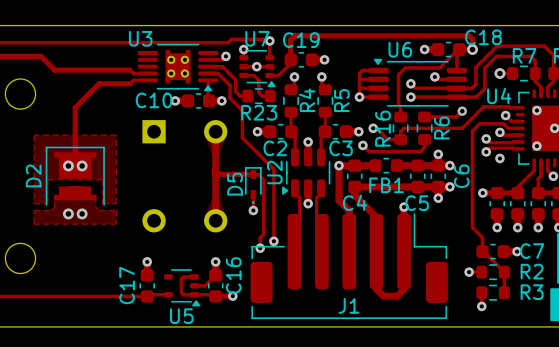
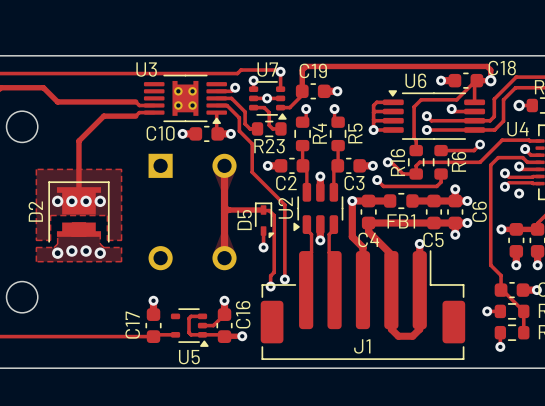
via: none -> (57, 201)
via: none -> (100, 201)
D5 footprint: [245, 167, 262, 204] -> [254, 202, 275, 239]
via: none -> (57, 253)
via: none -> (100, 253)

